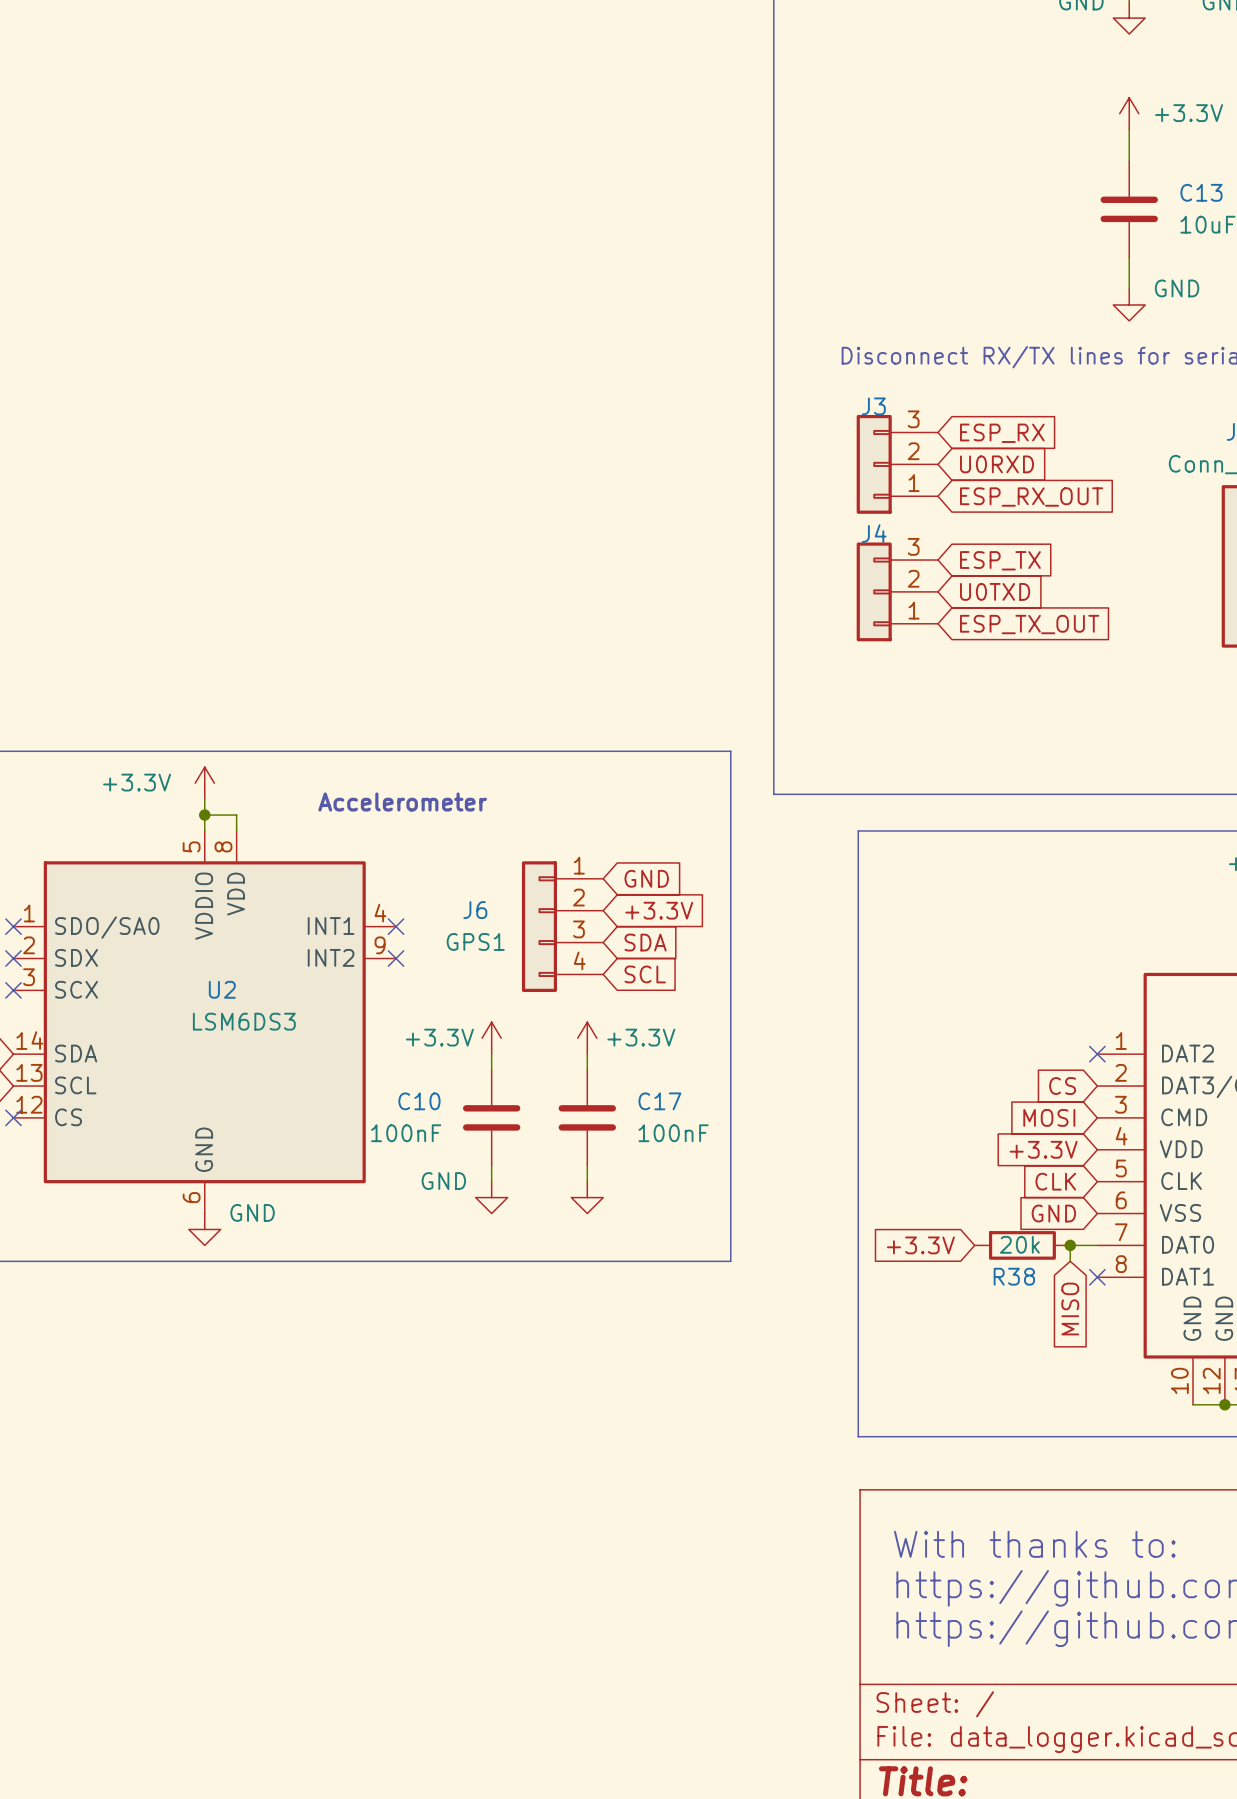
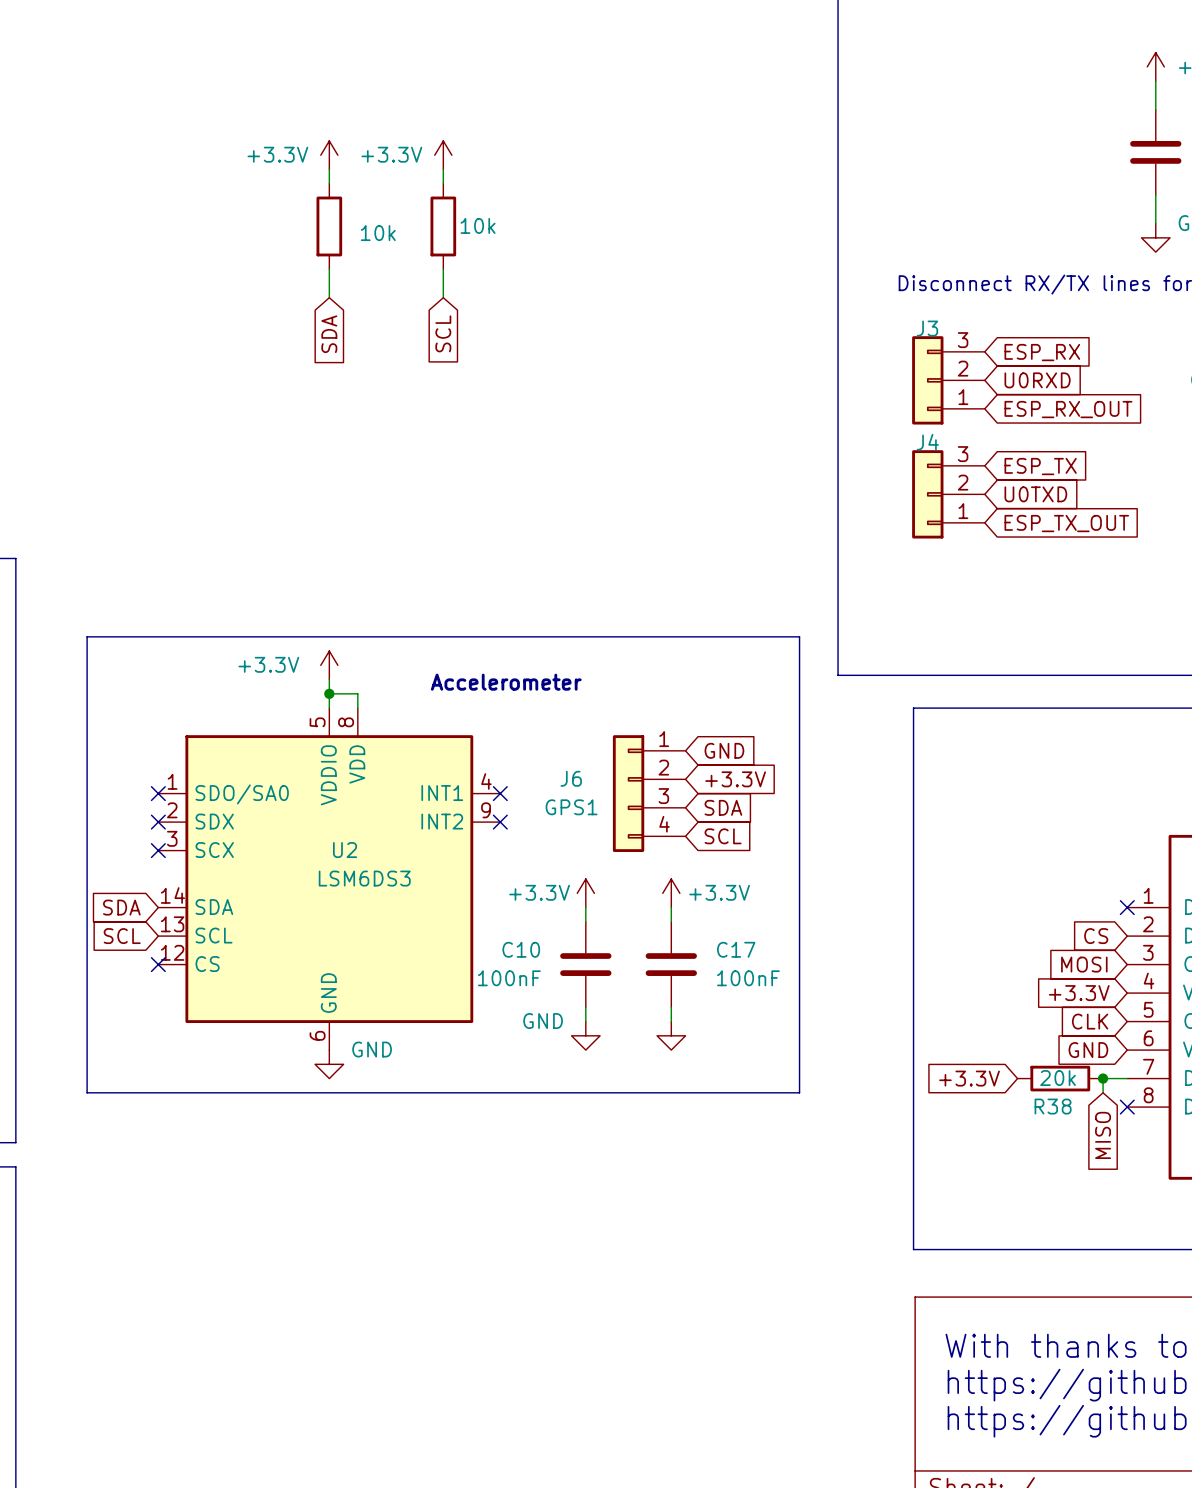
power symbol: none -> +3.3V (329, 155)
power symbol: none -> +3.3V (443, 155)
wire: none -> (329, 169) (329, 183)
wire: none -> (443, 169) (443, 183)
part: none -> 10k (329, 226)
part: none -> 10k (443, 226)
wire: none -> (329, 269) (329, 297)
wire: none -> (443, 269) (443, 297)
global label: none -> SDA (329, 334)
global label: none -> SCL (443, 333)

